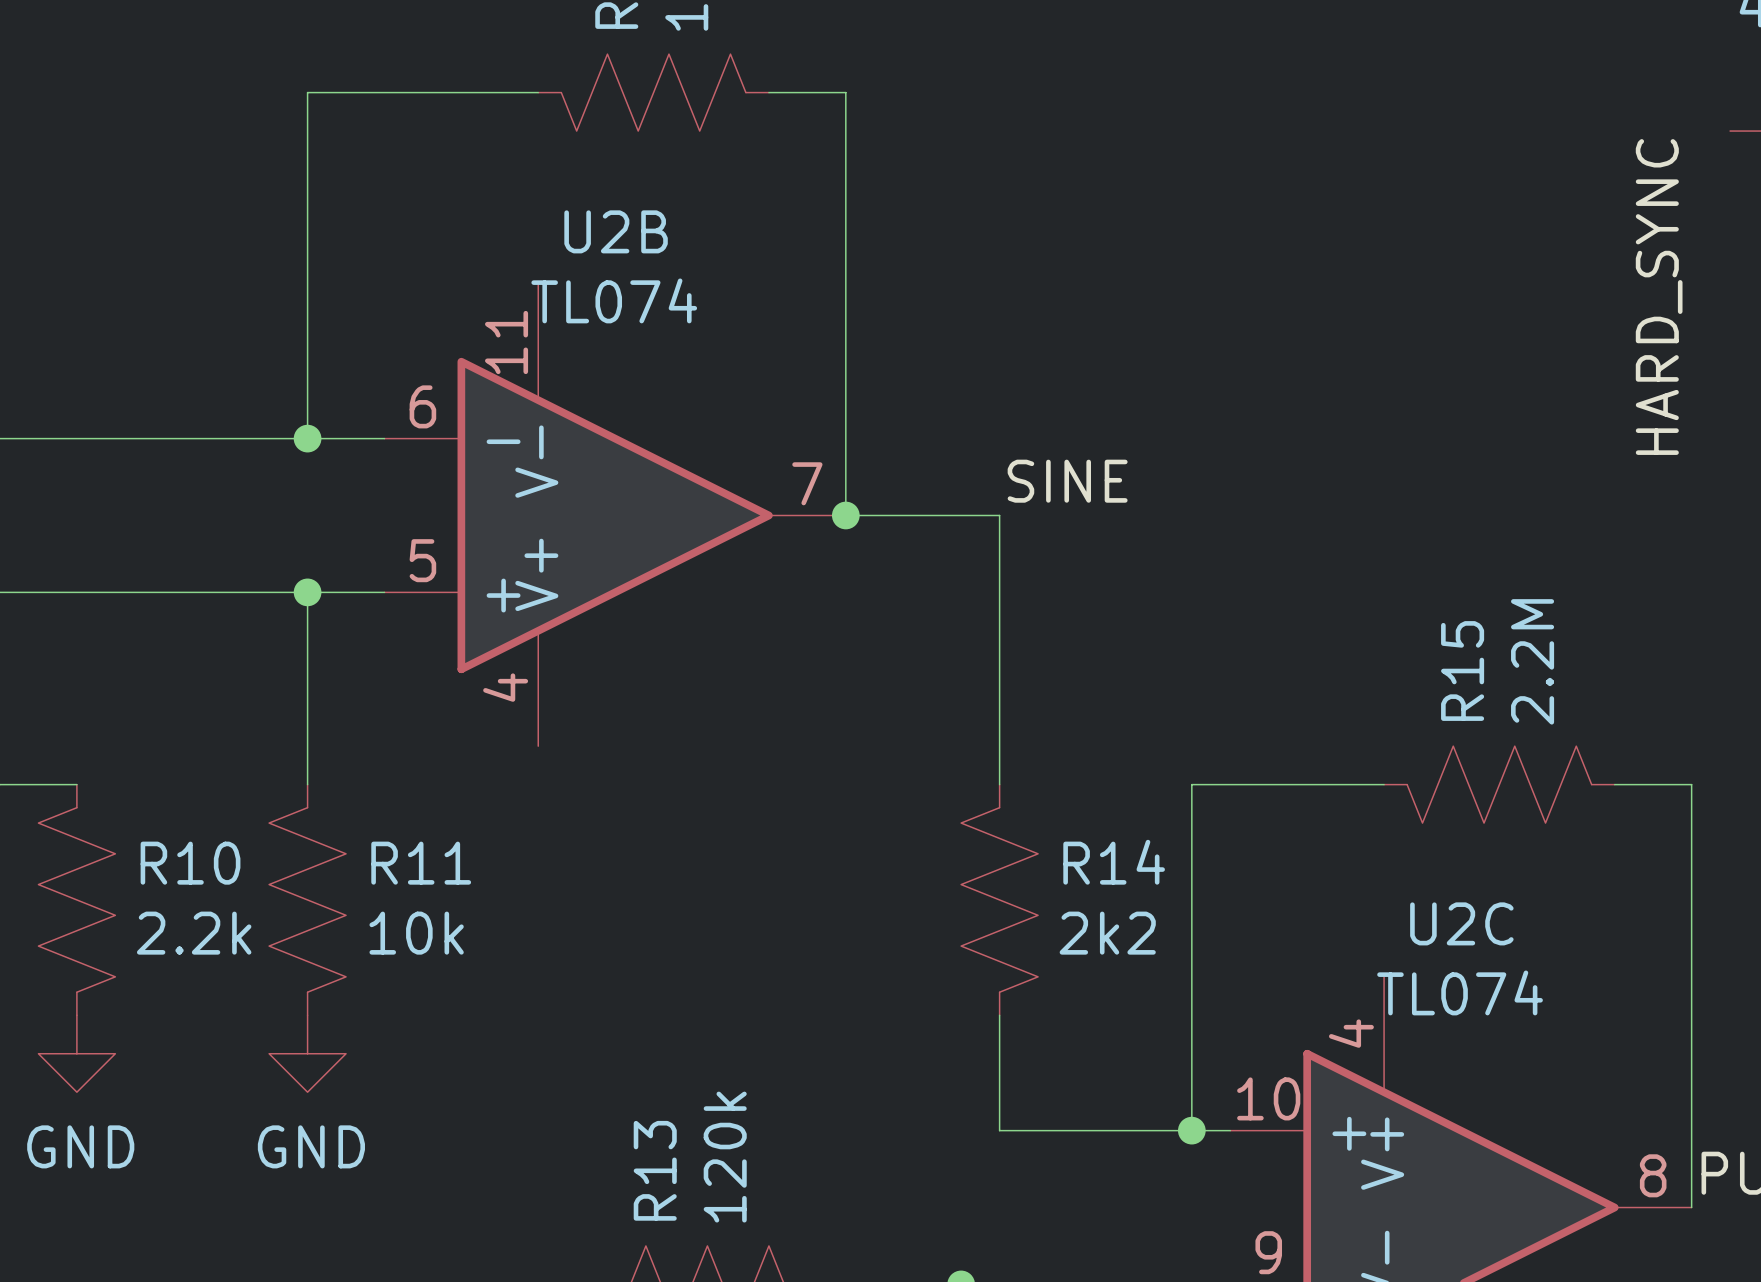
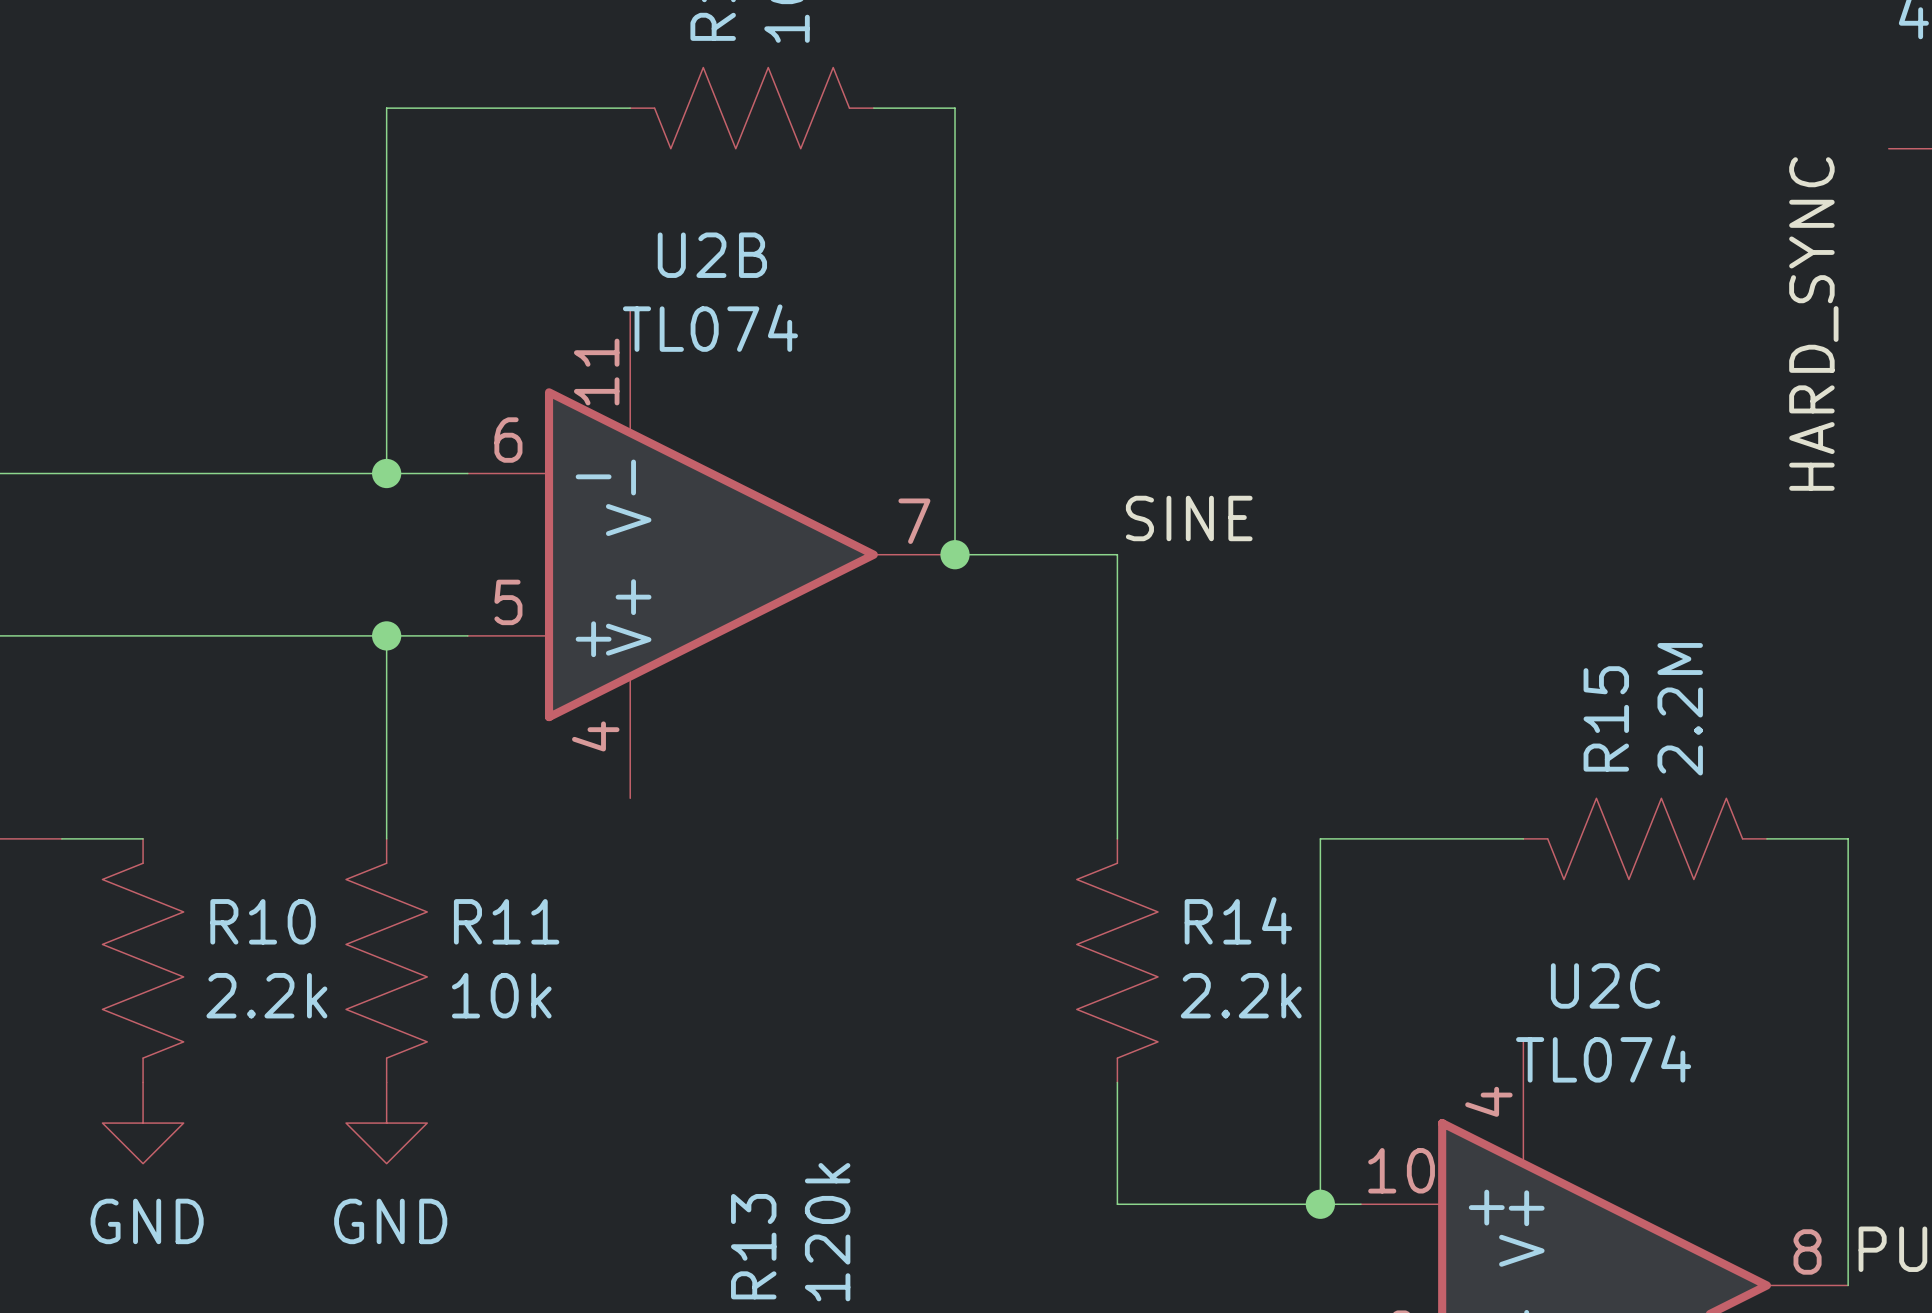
R14 value: 2k2 (1107, 933) -> 2.2k (1241, 995)

